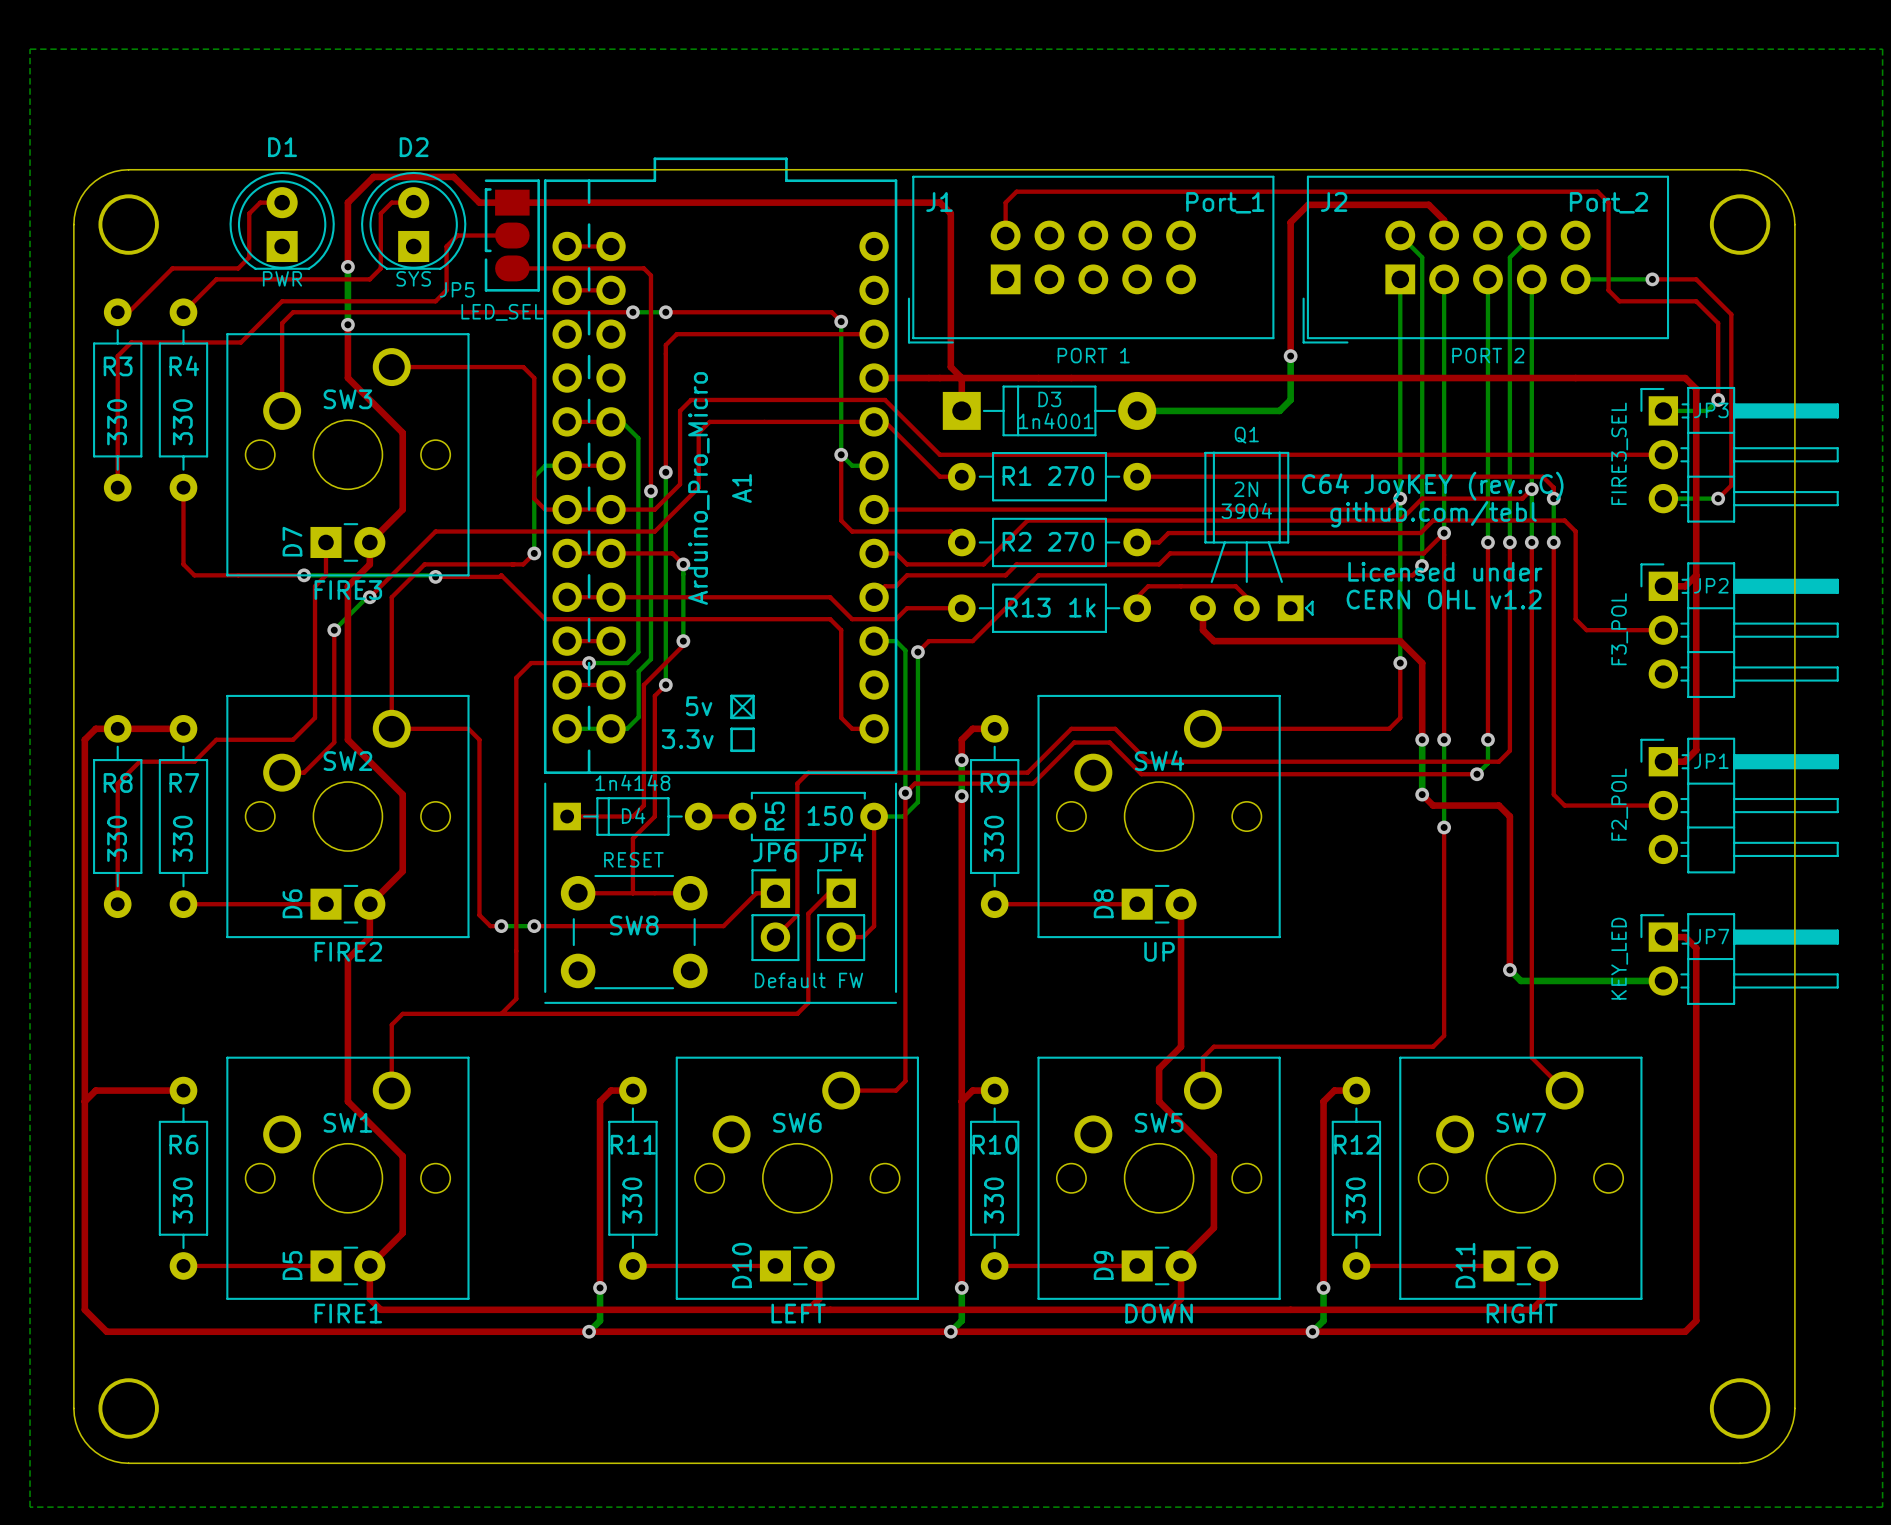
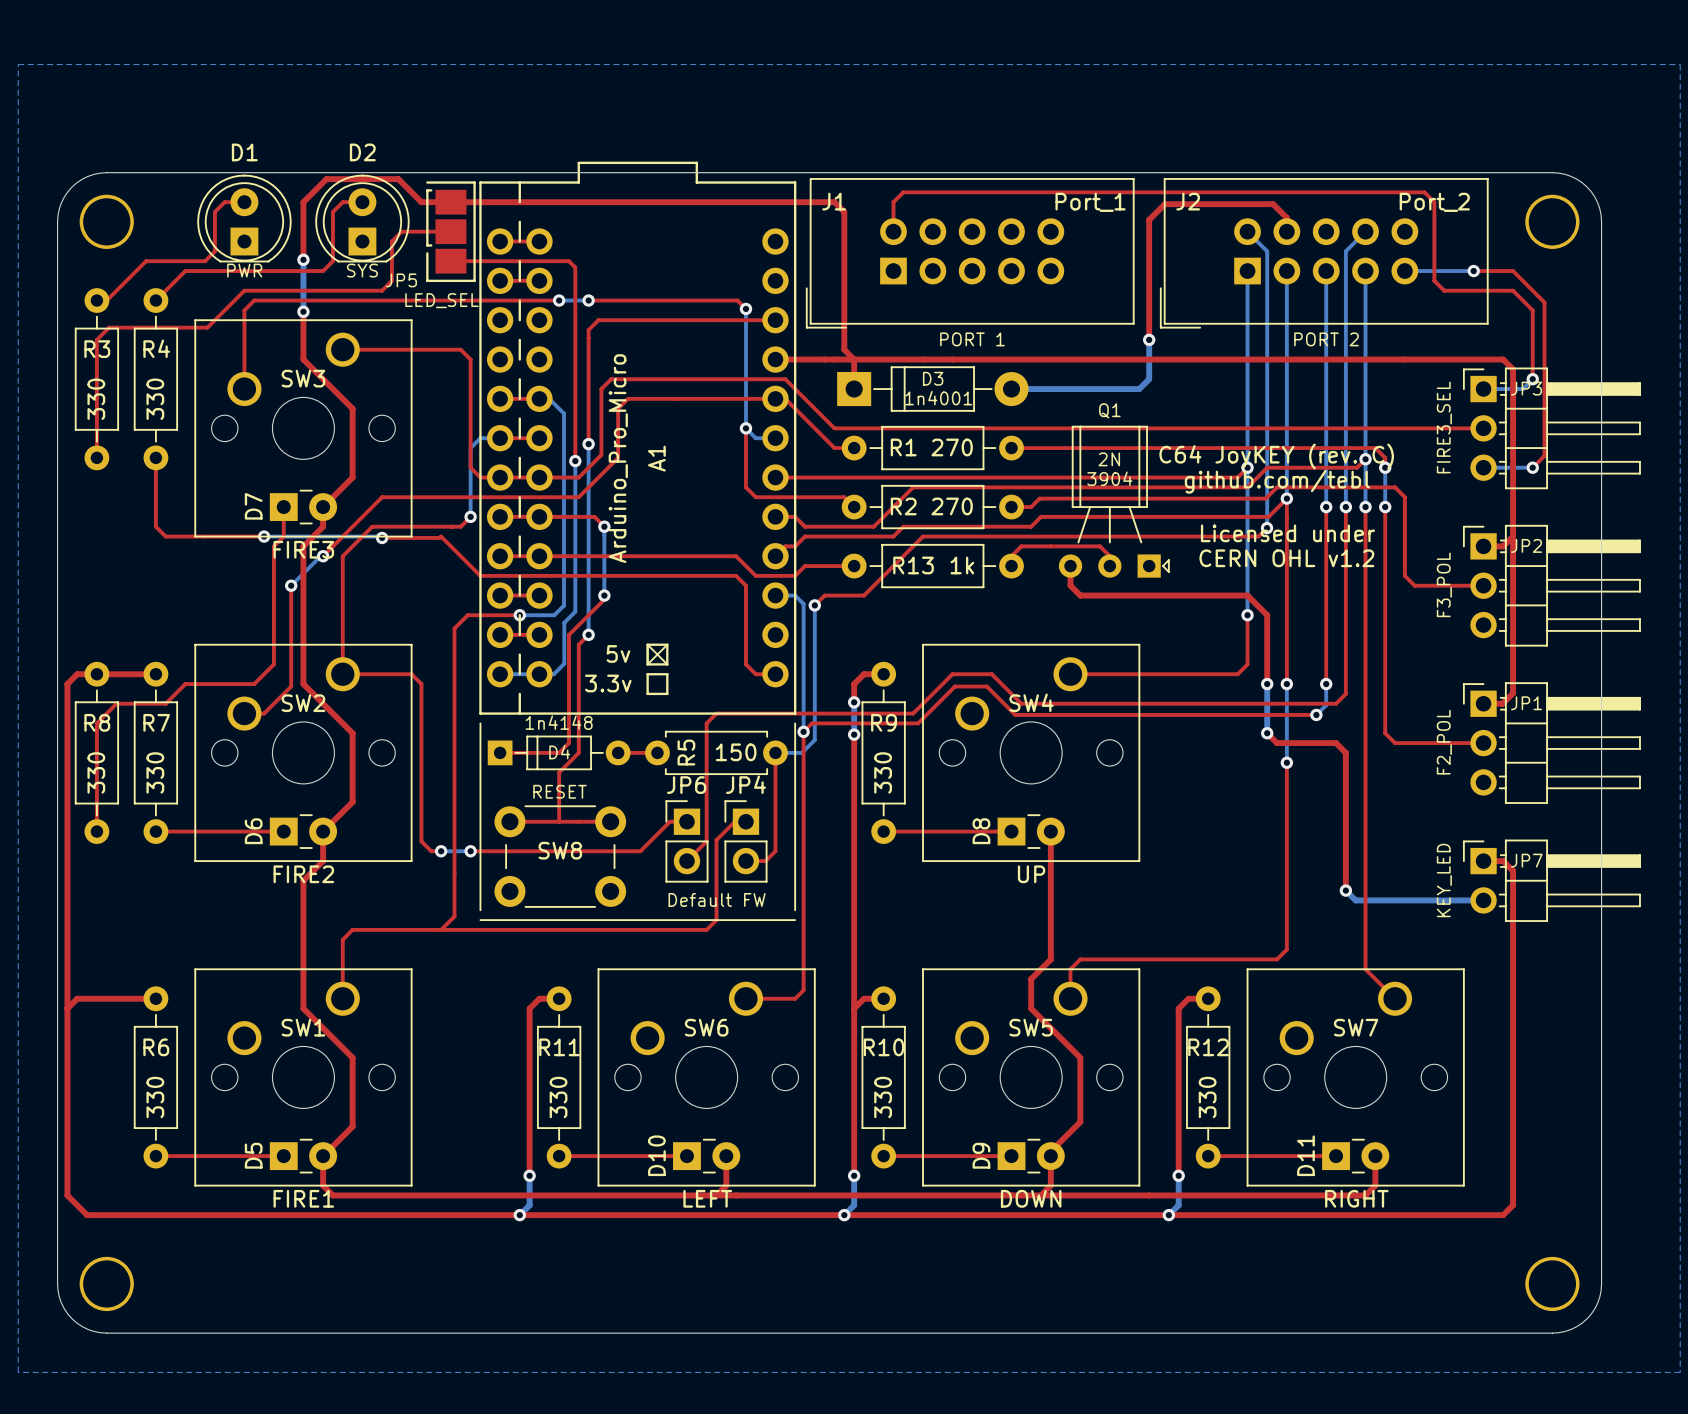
JP5 footprint: [484, 179, 540, 292] -> [426, 181, 476, 283]

